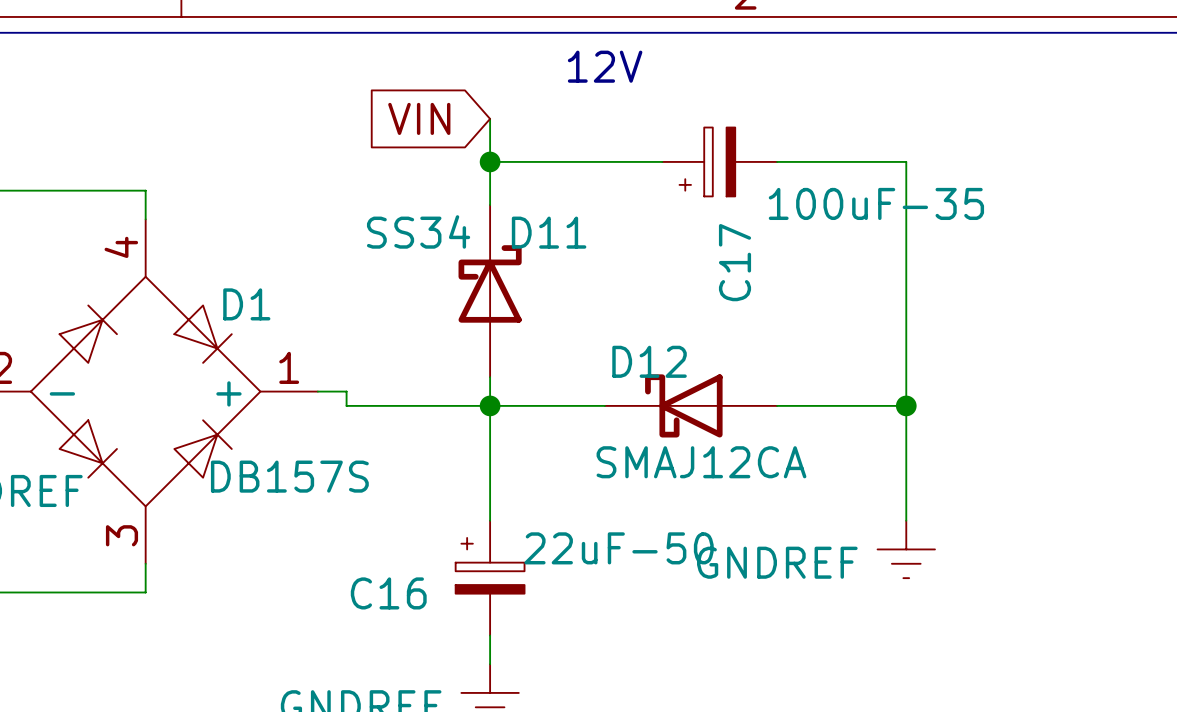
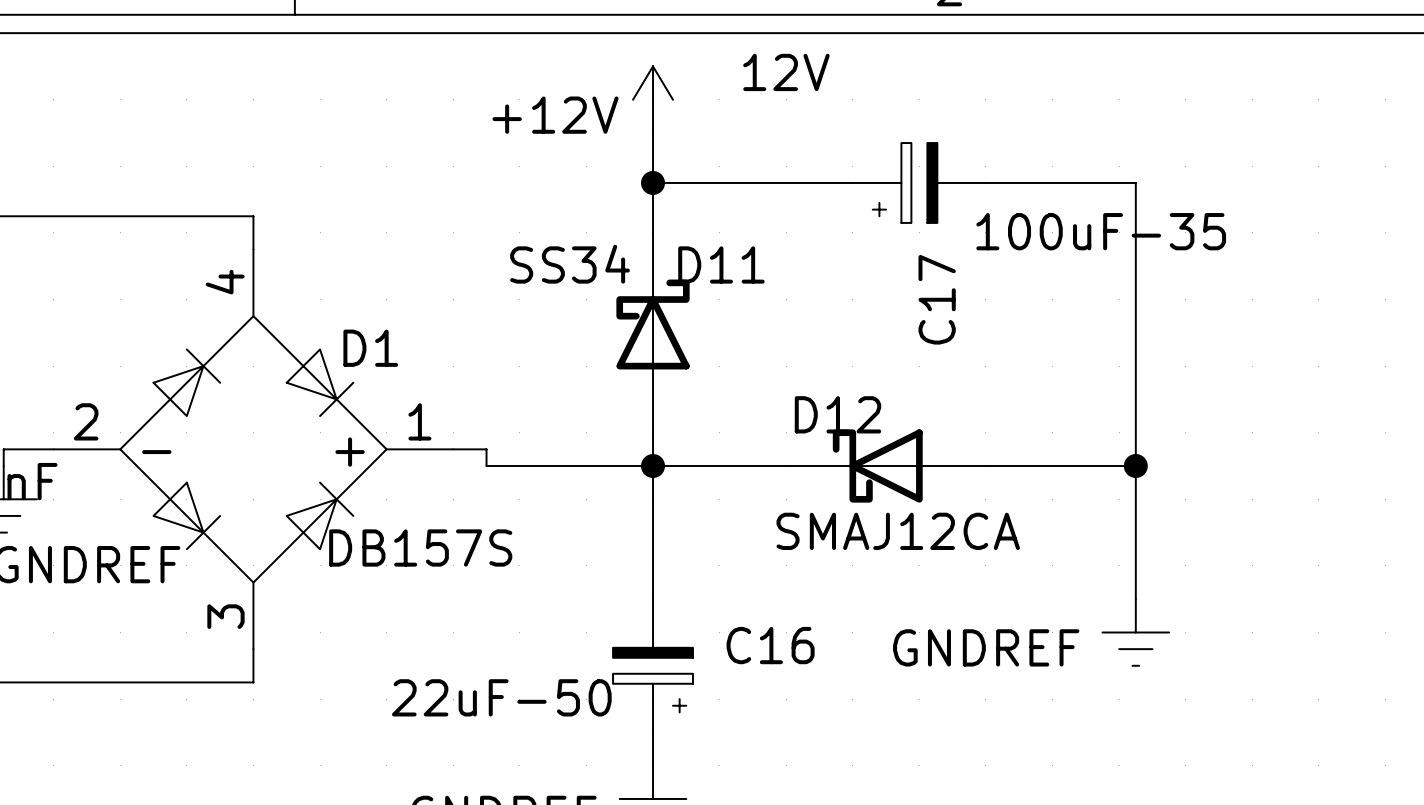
power symbol: none -> +12V (653, 99)
global label: VIN (419, 118) -> none
C16 rotation: 0° (490, 565) -> 180° (653, 680)

